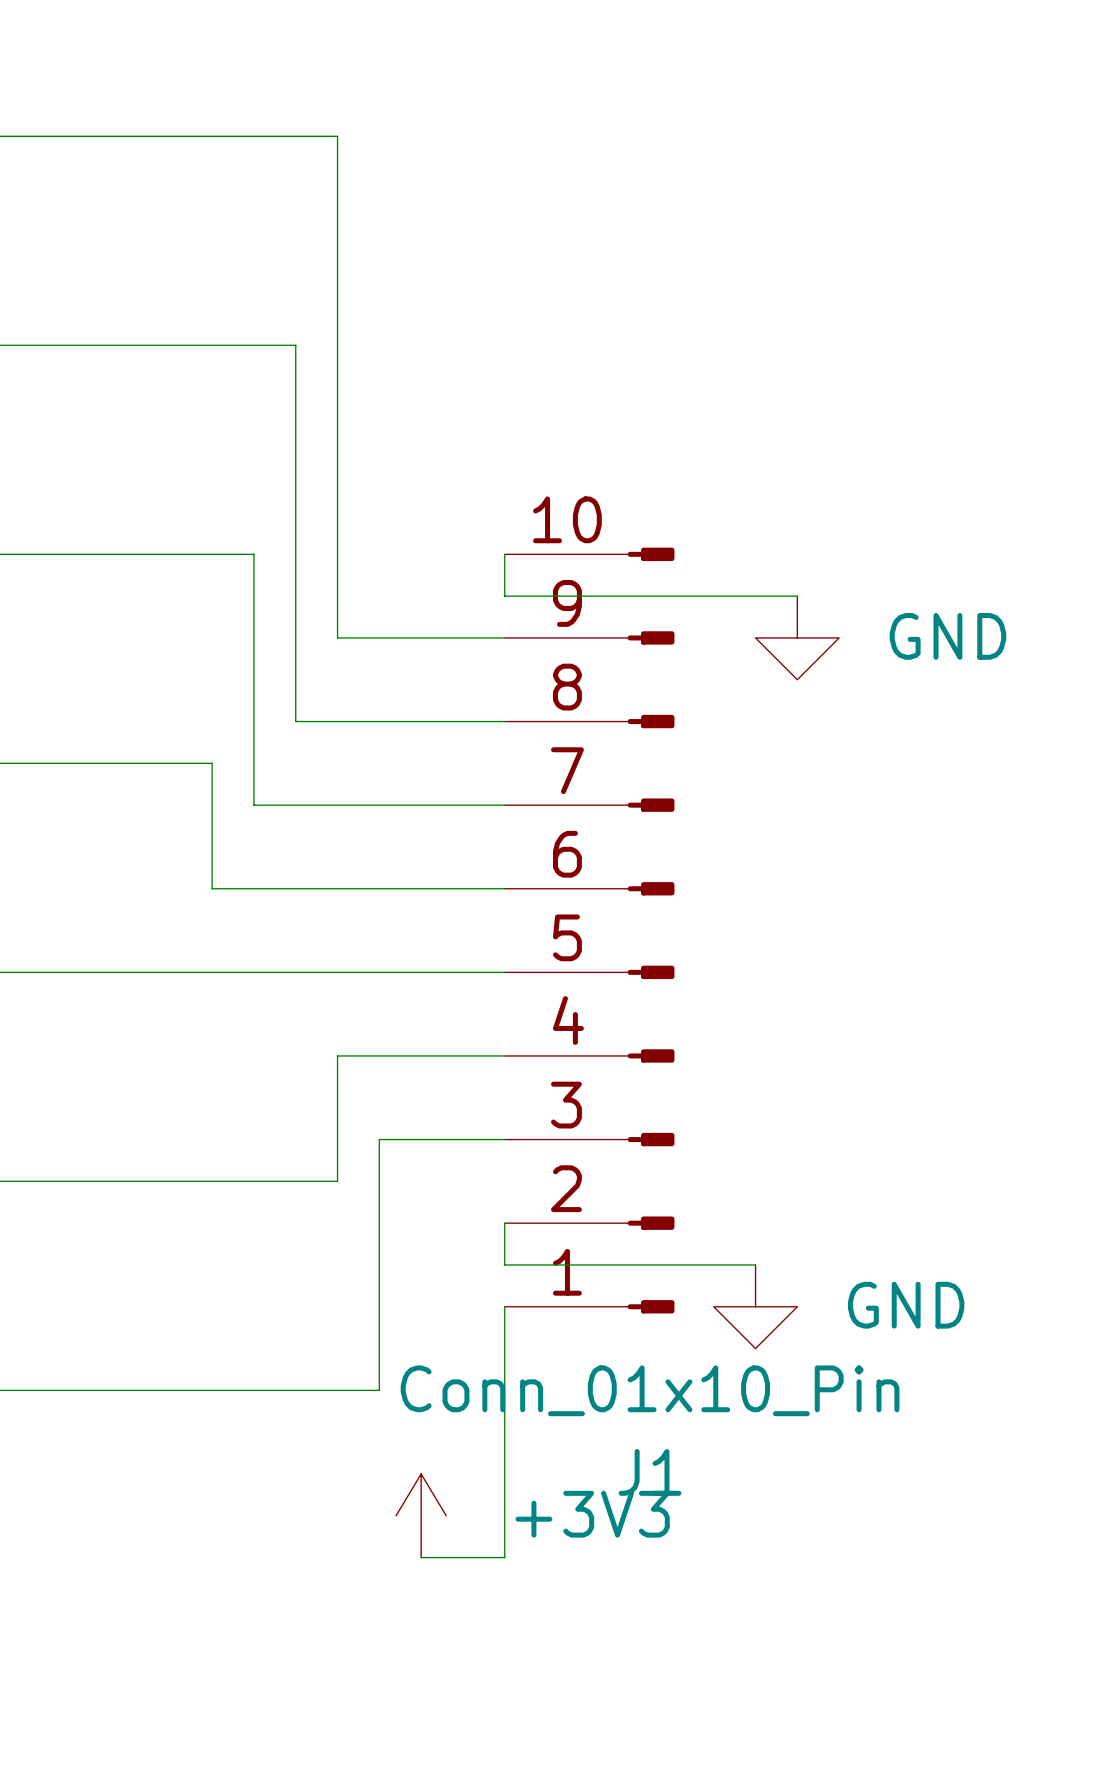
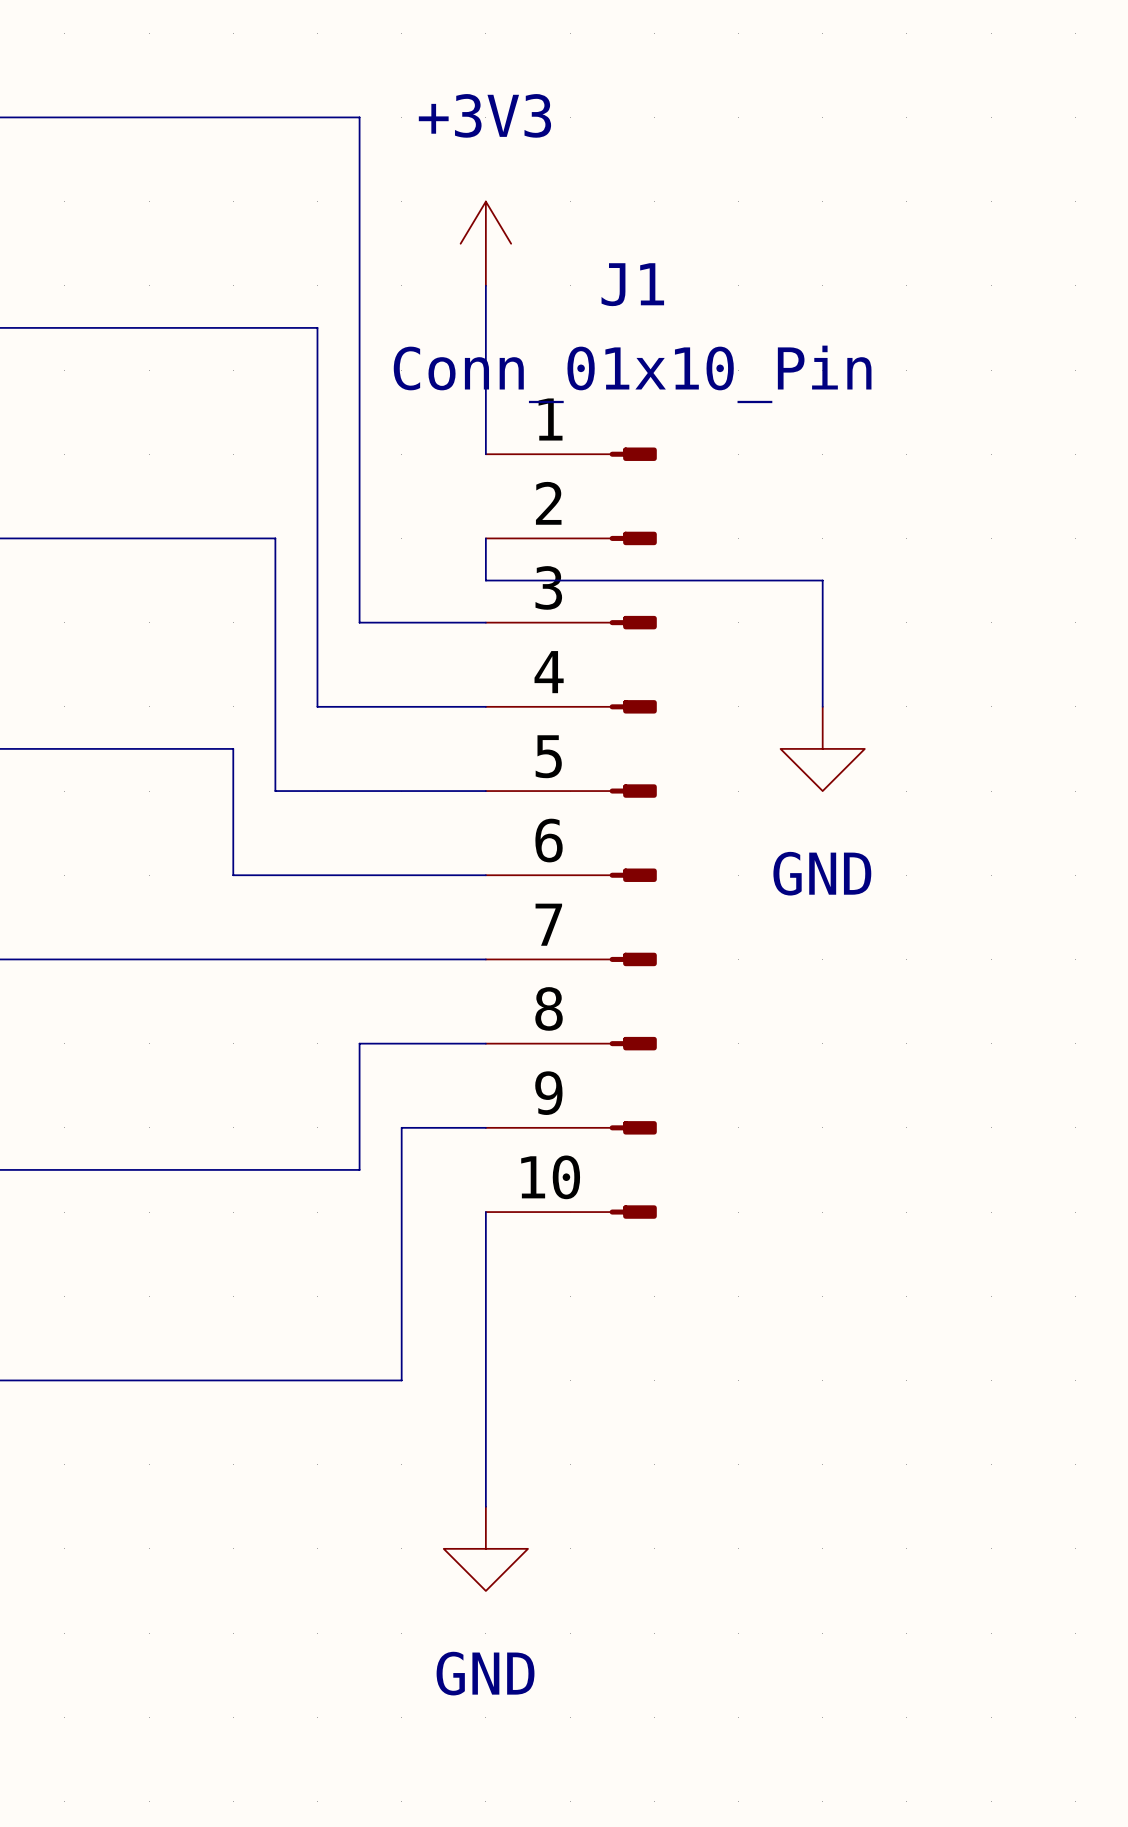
power symbol: none -> +3V3 (485, 243)
wire: none -> (485, 285) (485, 454)
wire: (504, 554) (504, 596) -> (485, 538) (485, 580) (527, 580)
wire: none -> (822, 580) (822, 706)
power symbol text position: GND (947, 636) -> GND (822, 873)
power symbol position: GND (797, 637) -> GND (822, 748)
J1 flip: as is (651, 930) -> up-down (633, 833)
wire: none -> (485, 1212) (485, 1506)
wire: (504, 1223) (504, 1264) (755, 1264) -> none
wire: (504, 1306) (504, 1557) (421, 1557) -> none
power symbol: GND (755, 1306) -> none
power symbol: +3V3 (421, 1515) -> none
power symbol: none -> GND (485, 1548)

